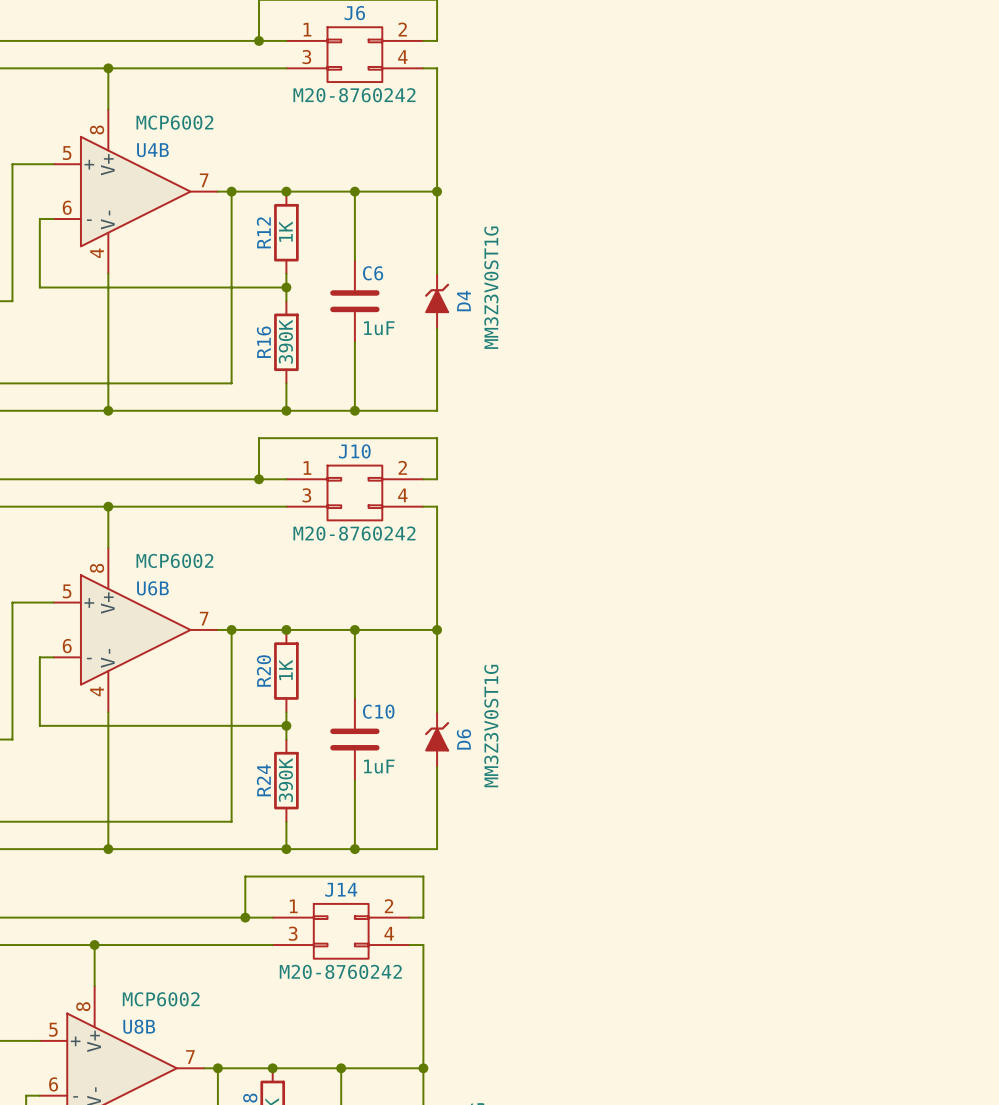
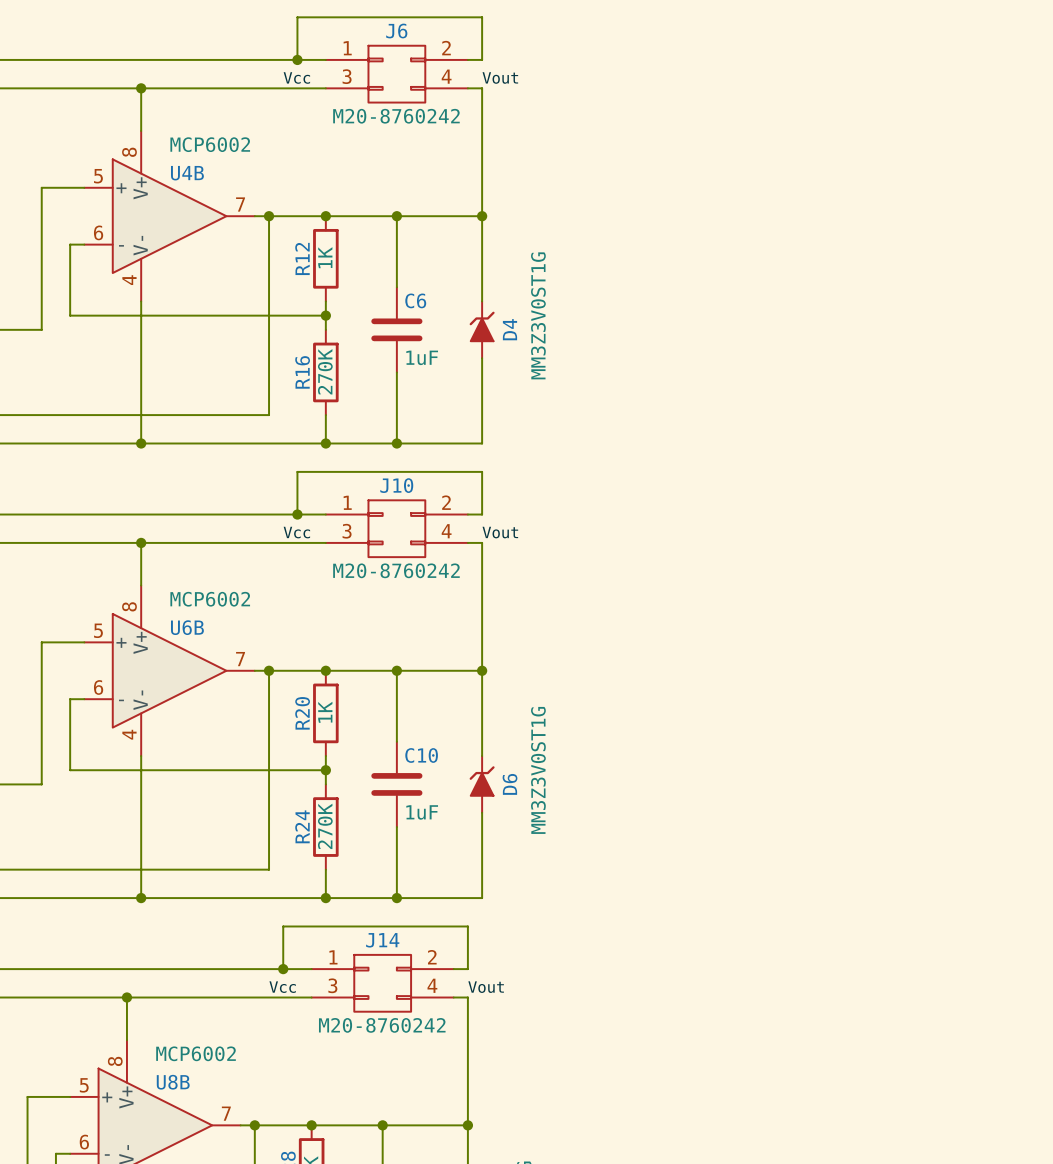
label: none -> Vcc (296, 77)
label: none -> Vout (500, 77)
R16 value: 390K (285, 341) -> 270K (325, 371)
label: none -> Vcc (296, 532)
label: none -> Vout (500, 532)
R24 value: 390K (285, 780) -> 270K (325, 826)
label: none -> Vcc (282, 987)
label: none -> Vout (486, 987)

